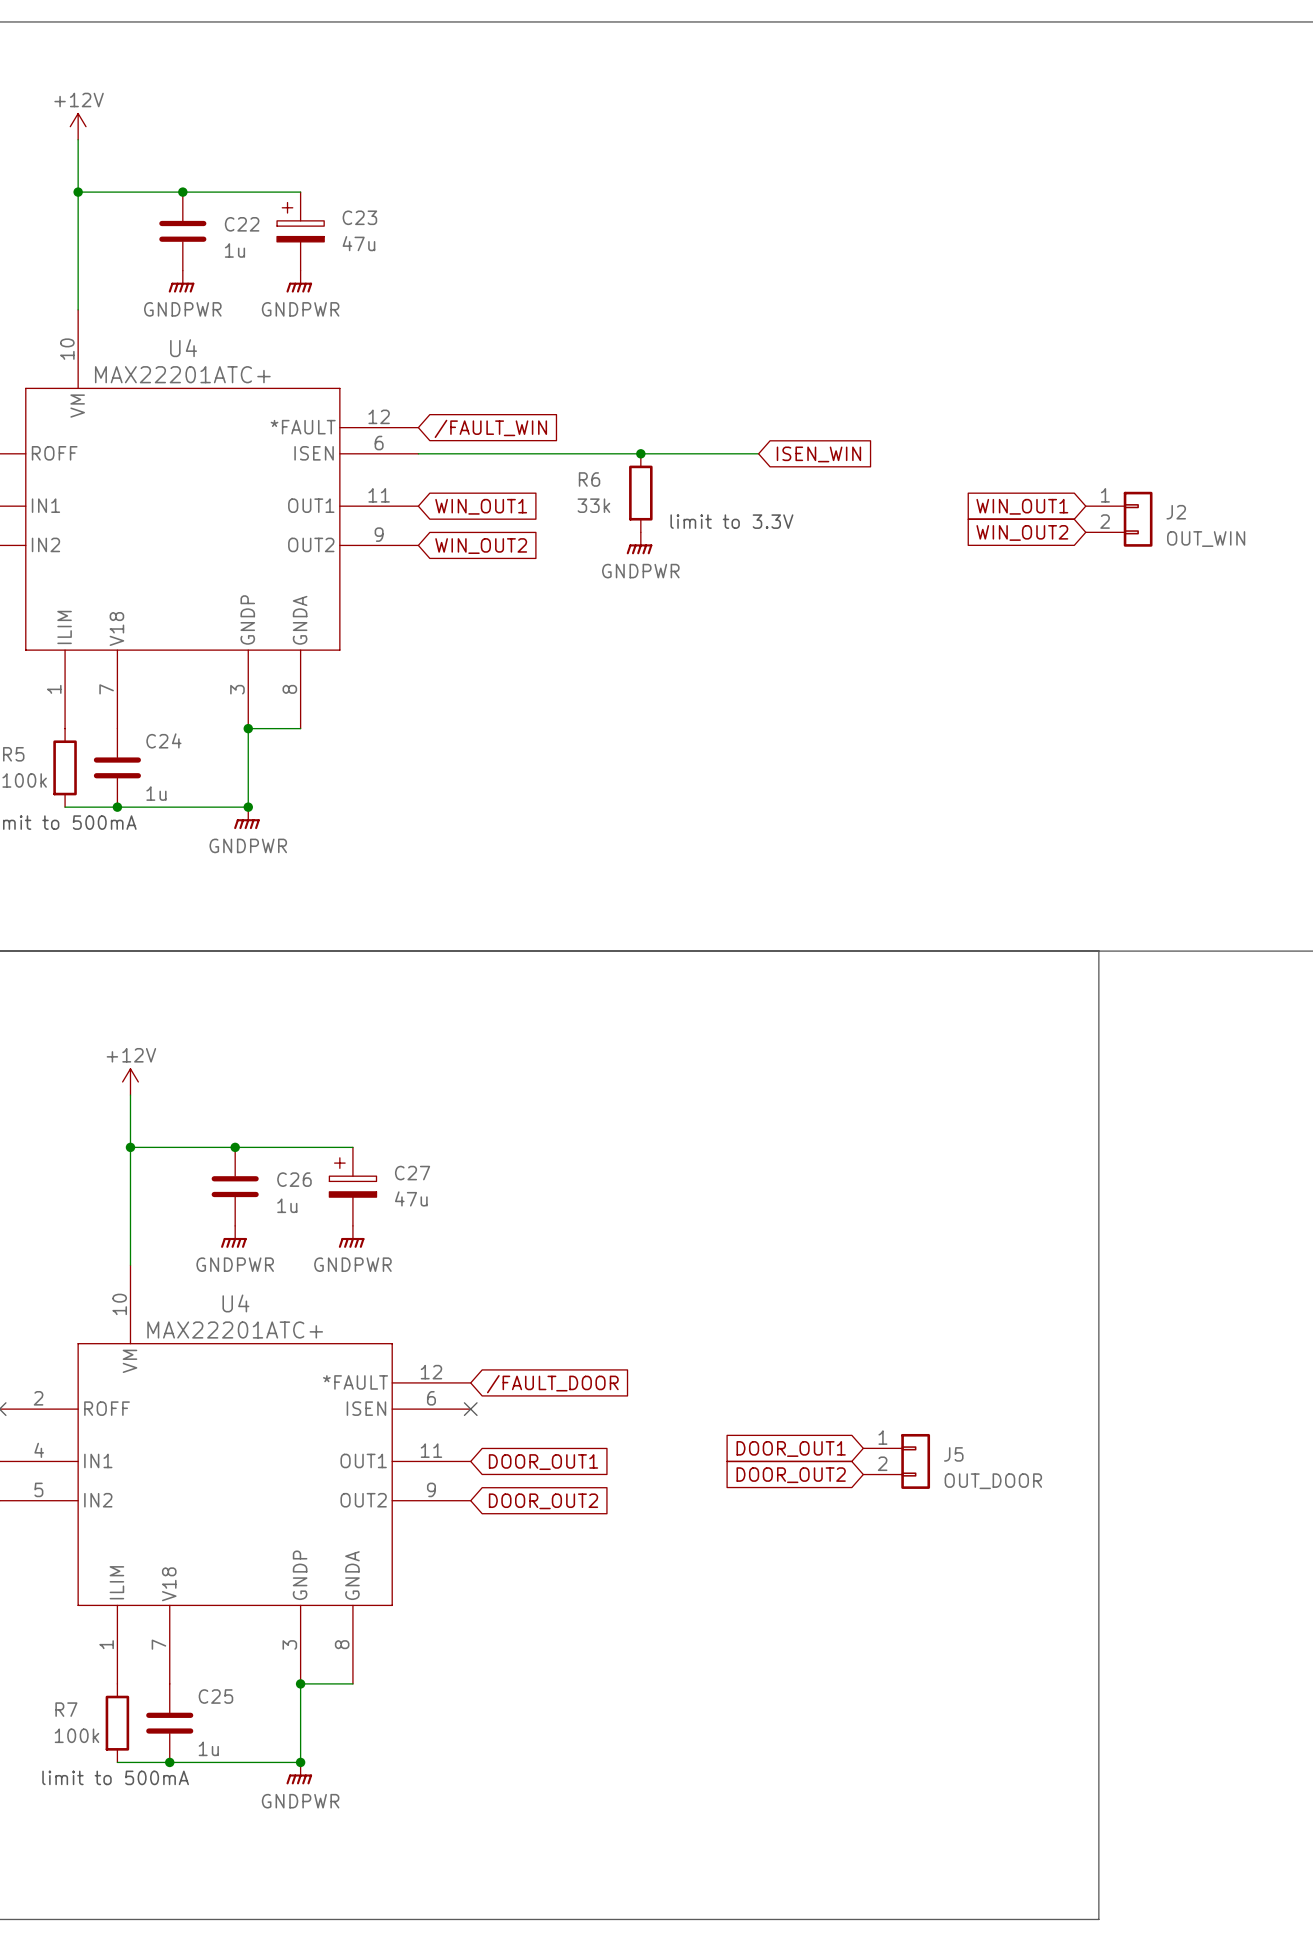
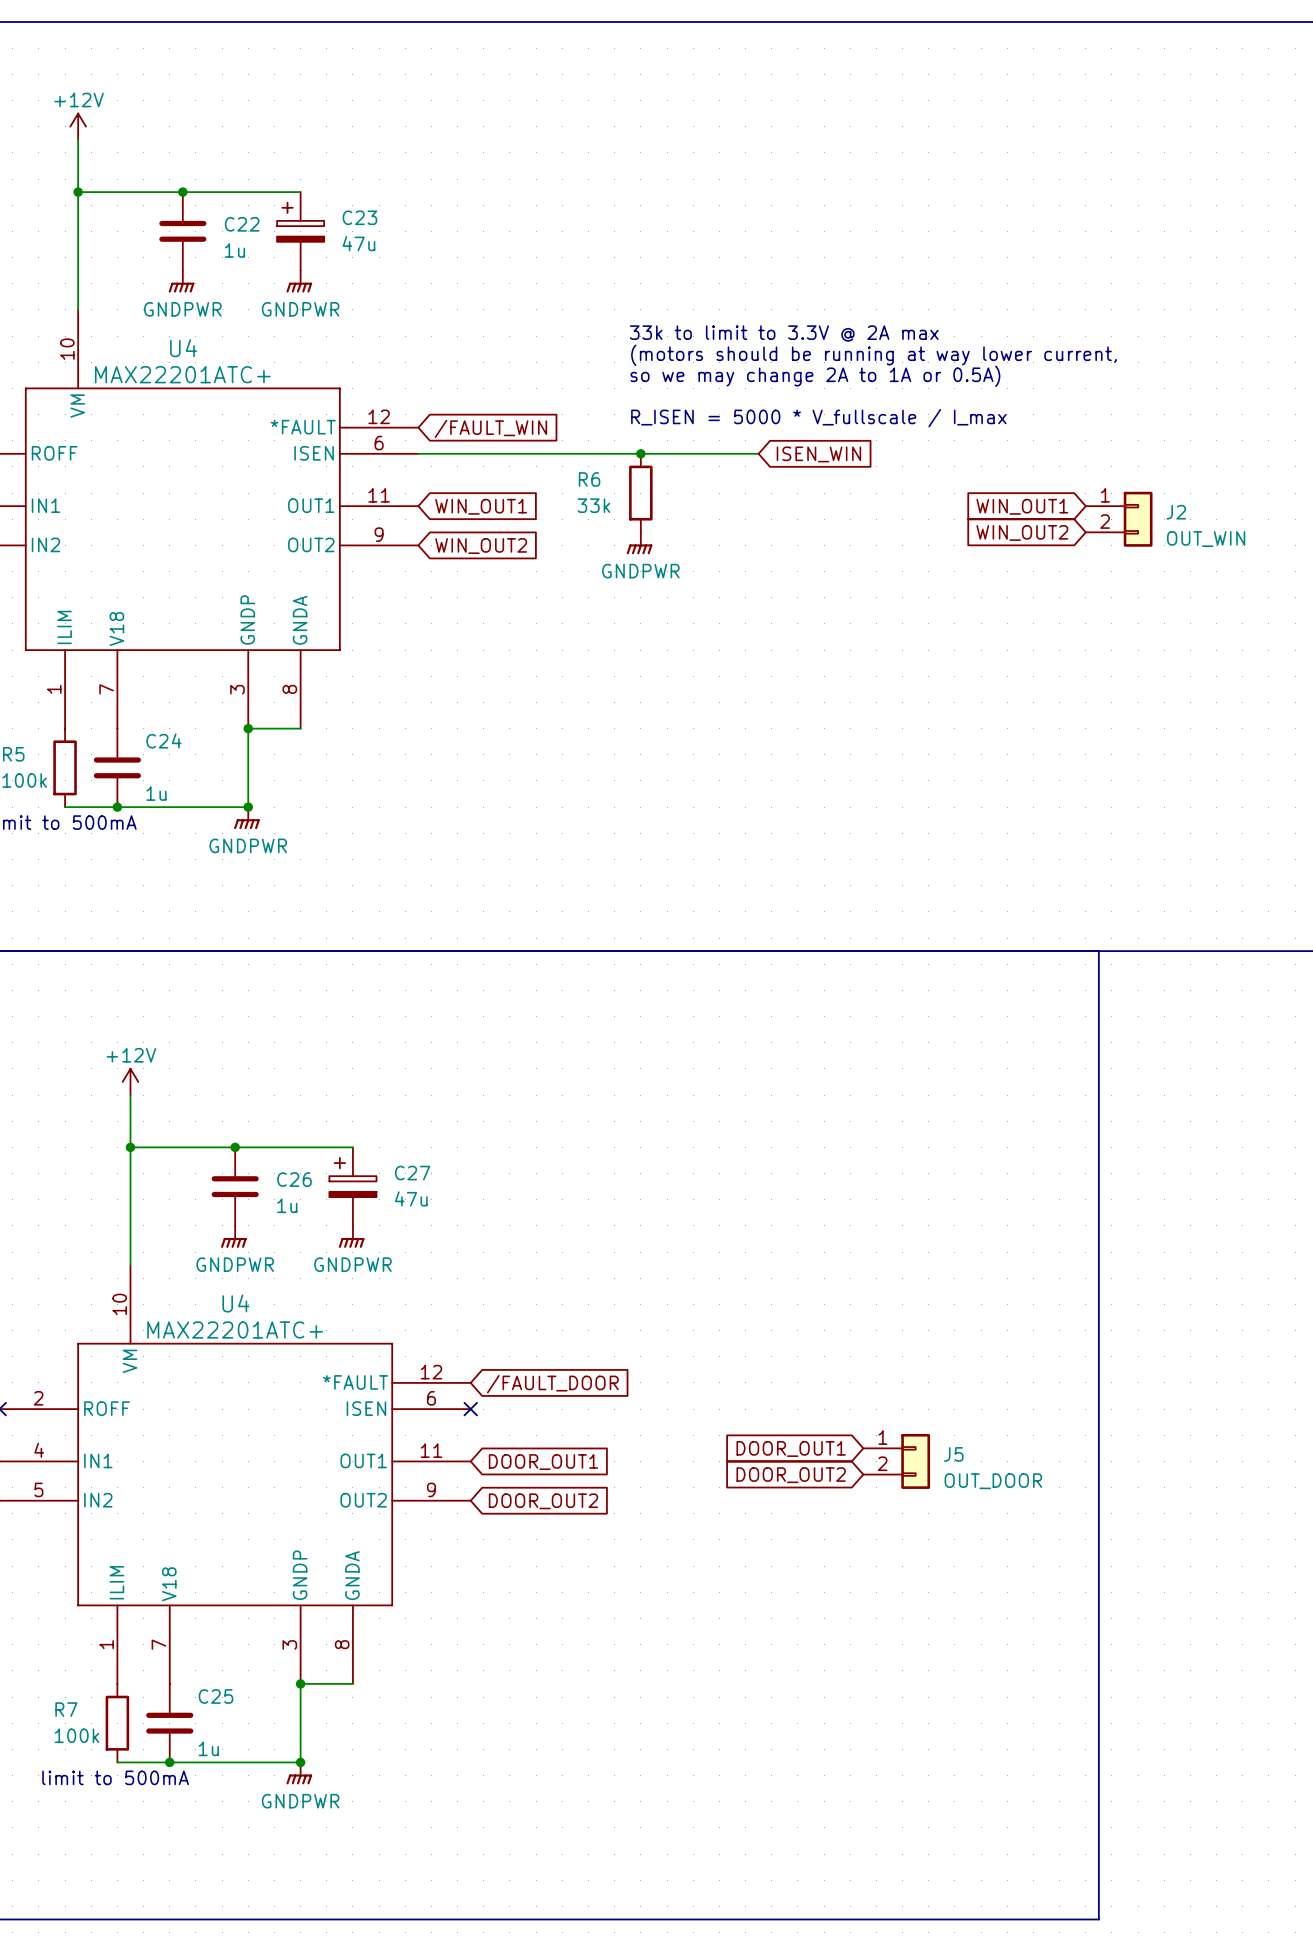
text: none -> 33k to limit to 3.3V @ 2A max (784, 333)
text: none -> (motors should be running at way lower current, (874, 355)
text: none -> so we may change 2A to 1A or 0.5A) (815, 376)
text: none -> R_ISEN = 5000 * V_fullscale / I_max (818, 418)
text: limit to 3.3V (731, 521) -> none

